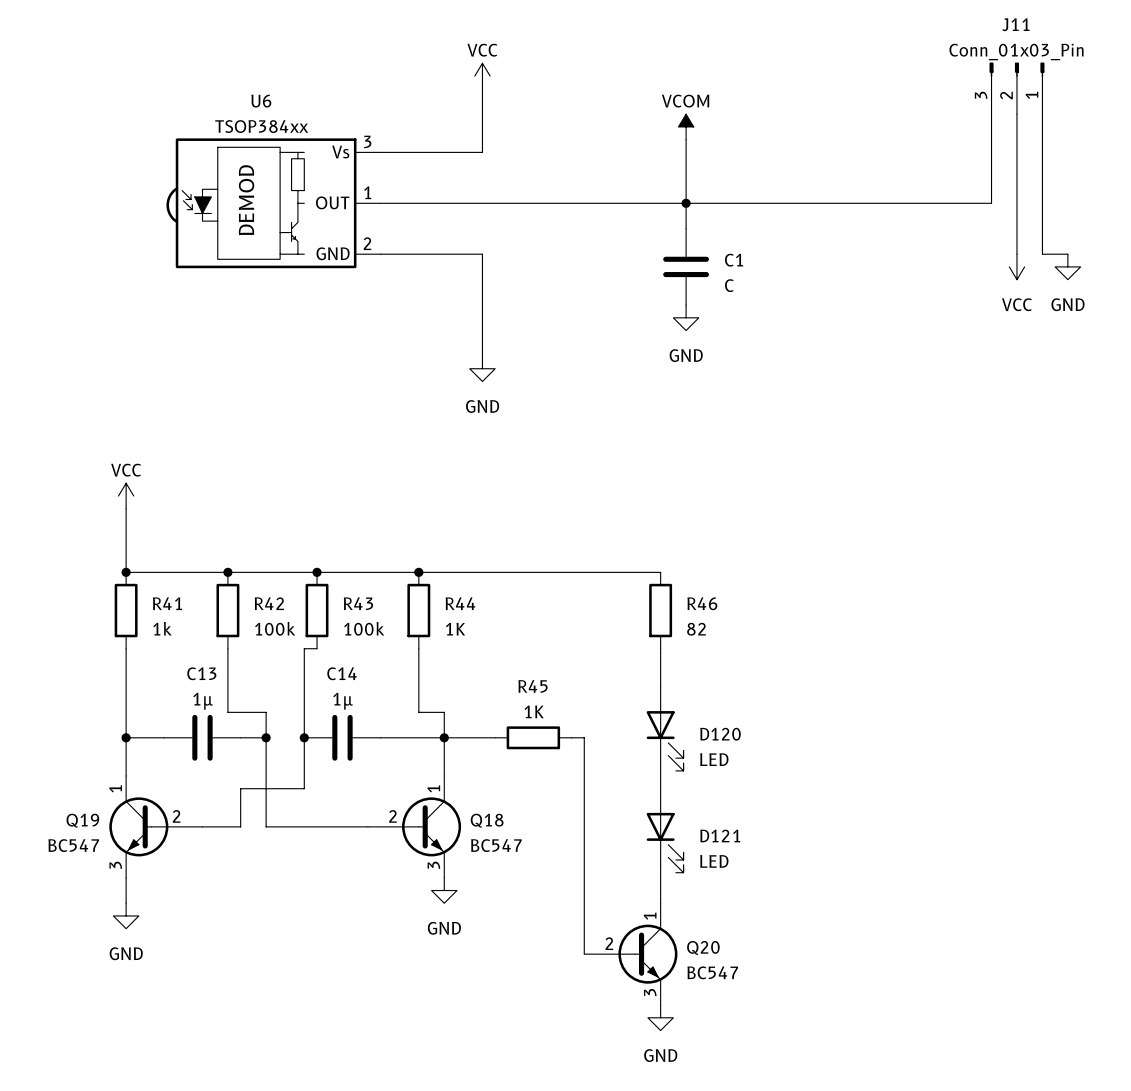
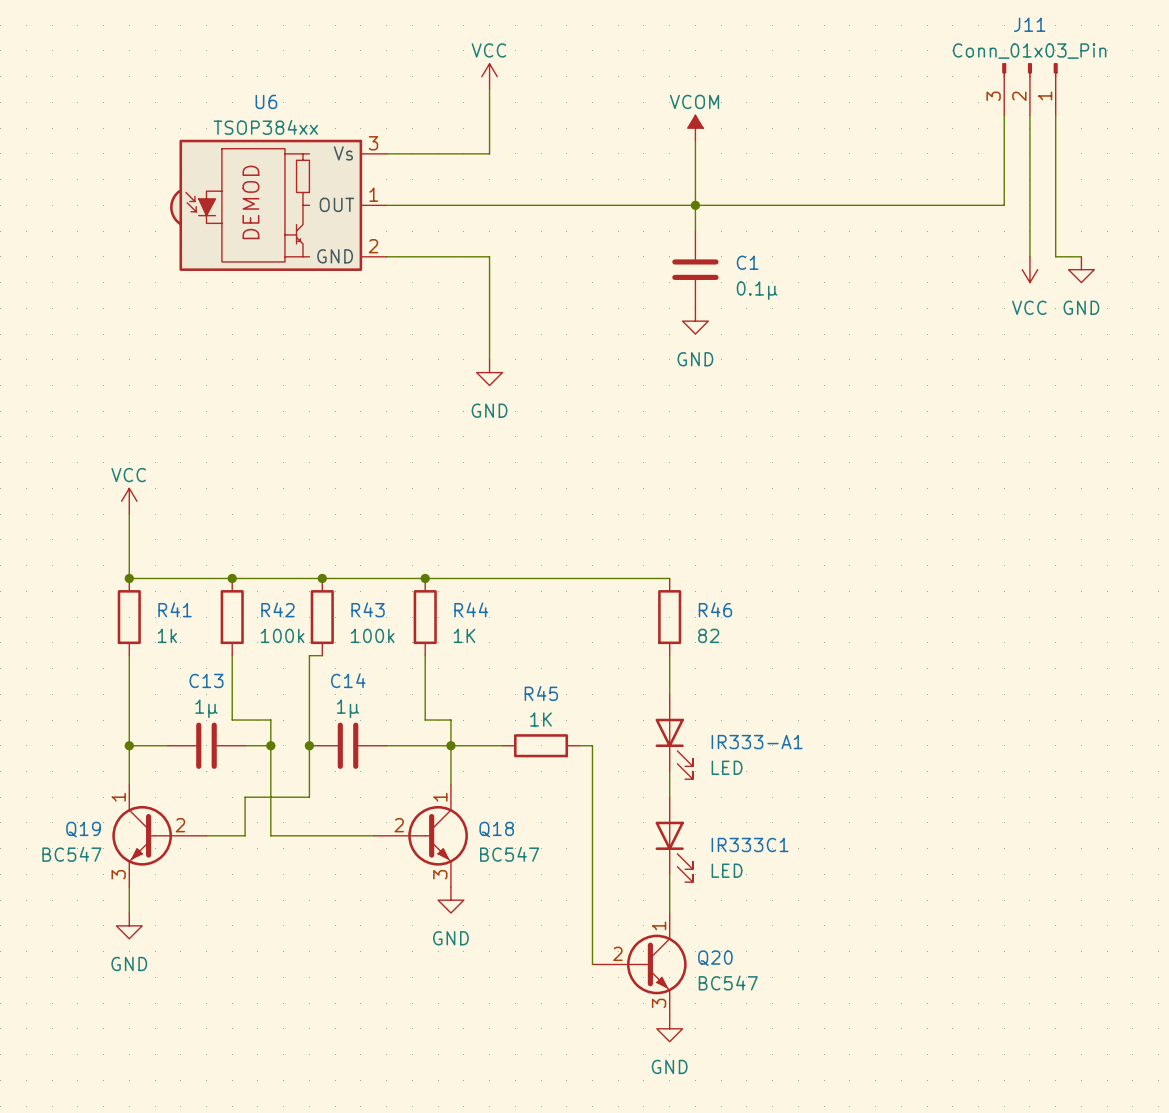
C1 value: C (729, 285) -> 0.1µ (757, 290)
D120 name: D120 (720, 734) -> IR333-A1 (757, 742)
D121 name: D121 (720, 835) -> IR333C1 (750, 844)

